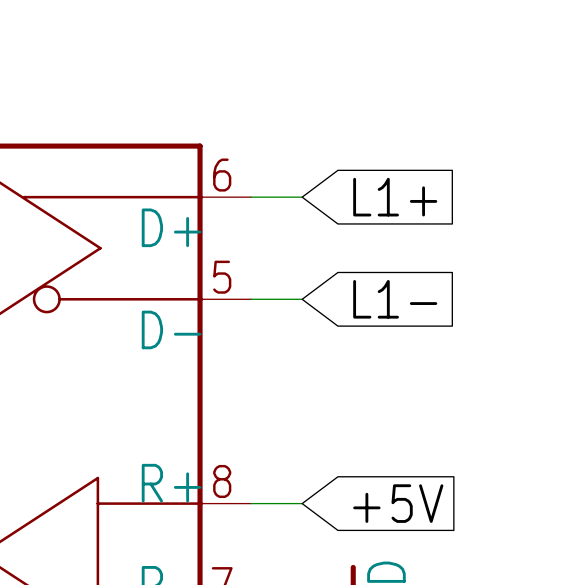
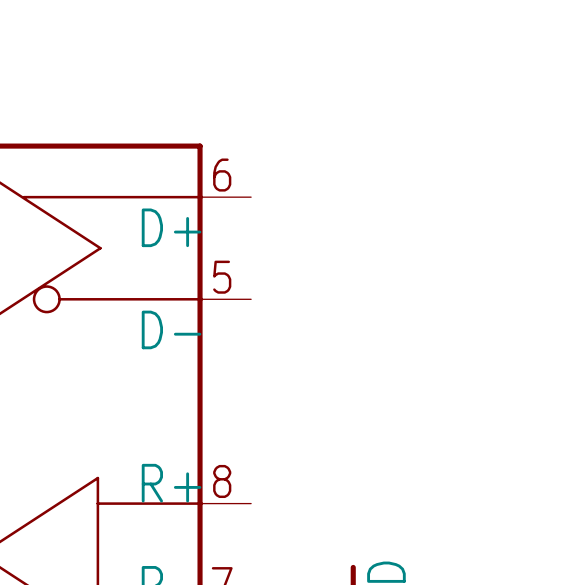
wire: (251, 197) (302, 197) -> none
global label: L1+ (395, 197) -> none
wire: (251, 299) (302, 299) -> none
global label: L1- (395, 299) -> none
wire: (251, 503) (302, 503) -> none
global label: +5V (398, 503) -> none

